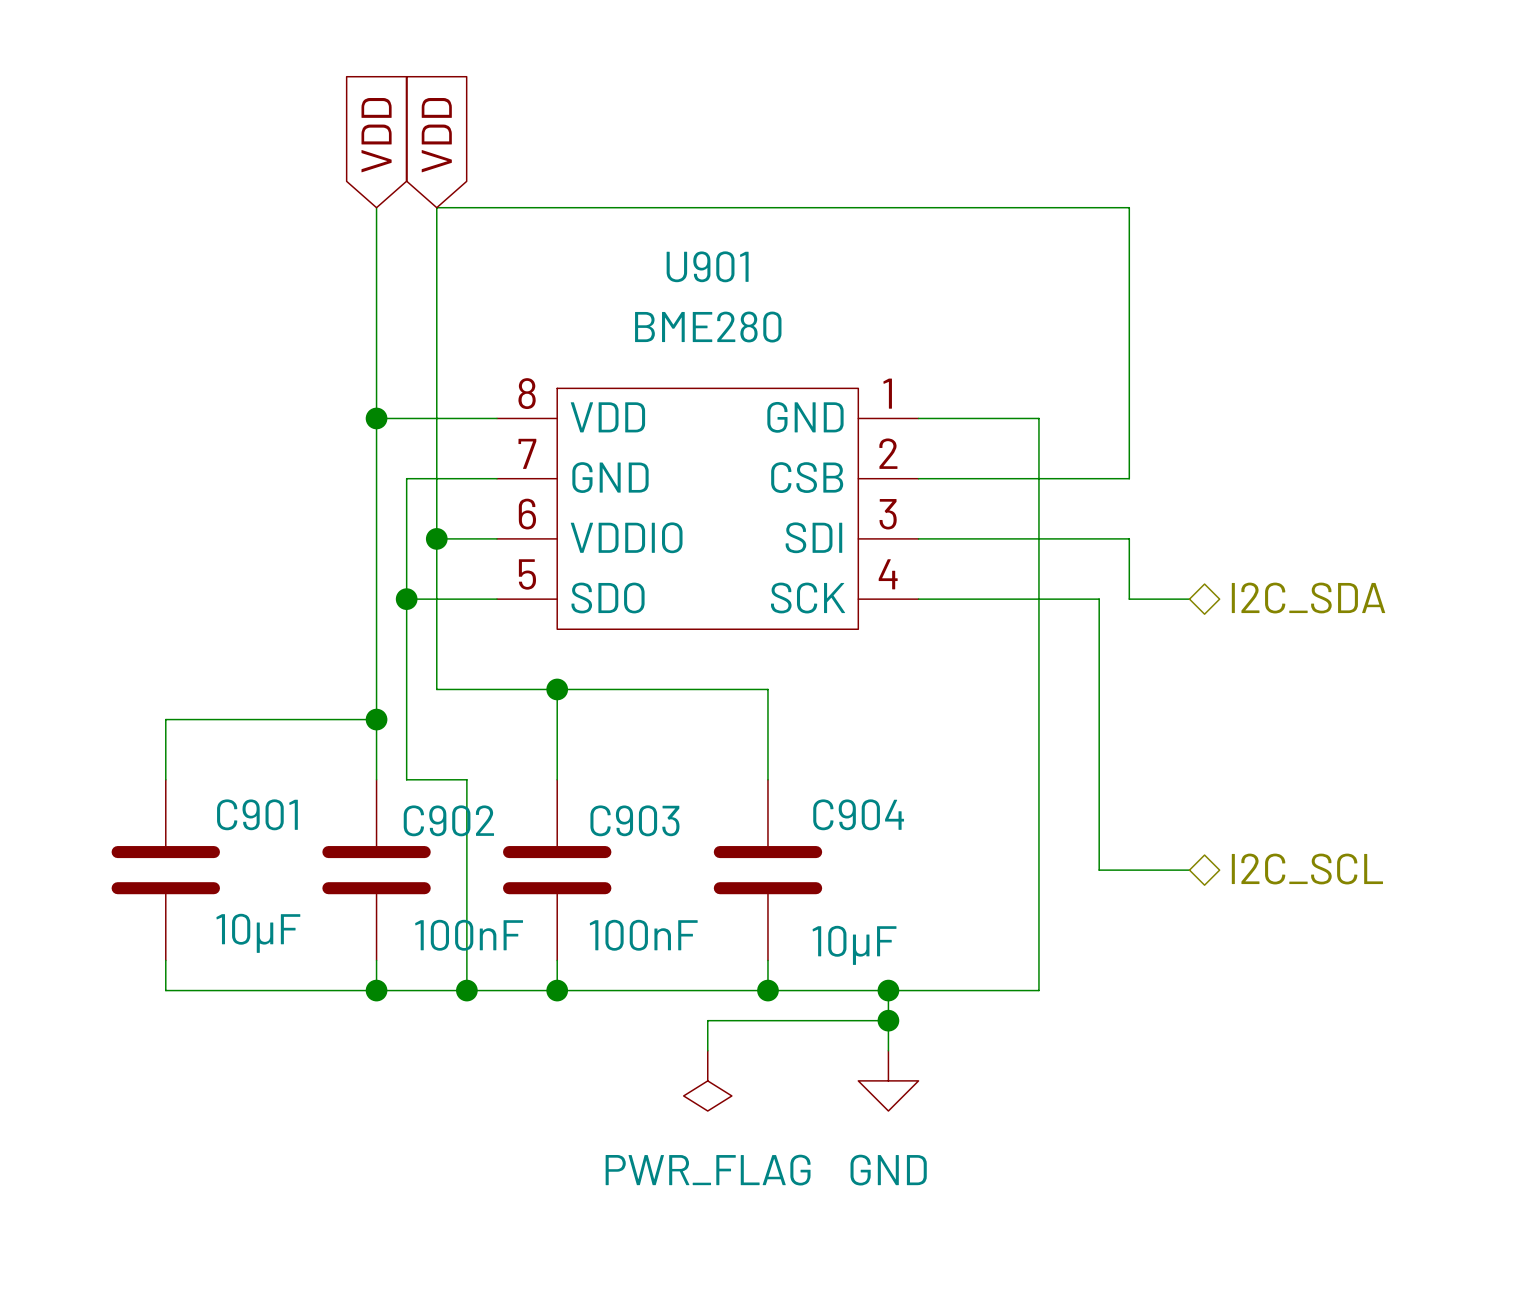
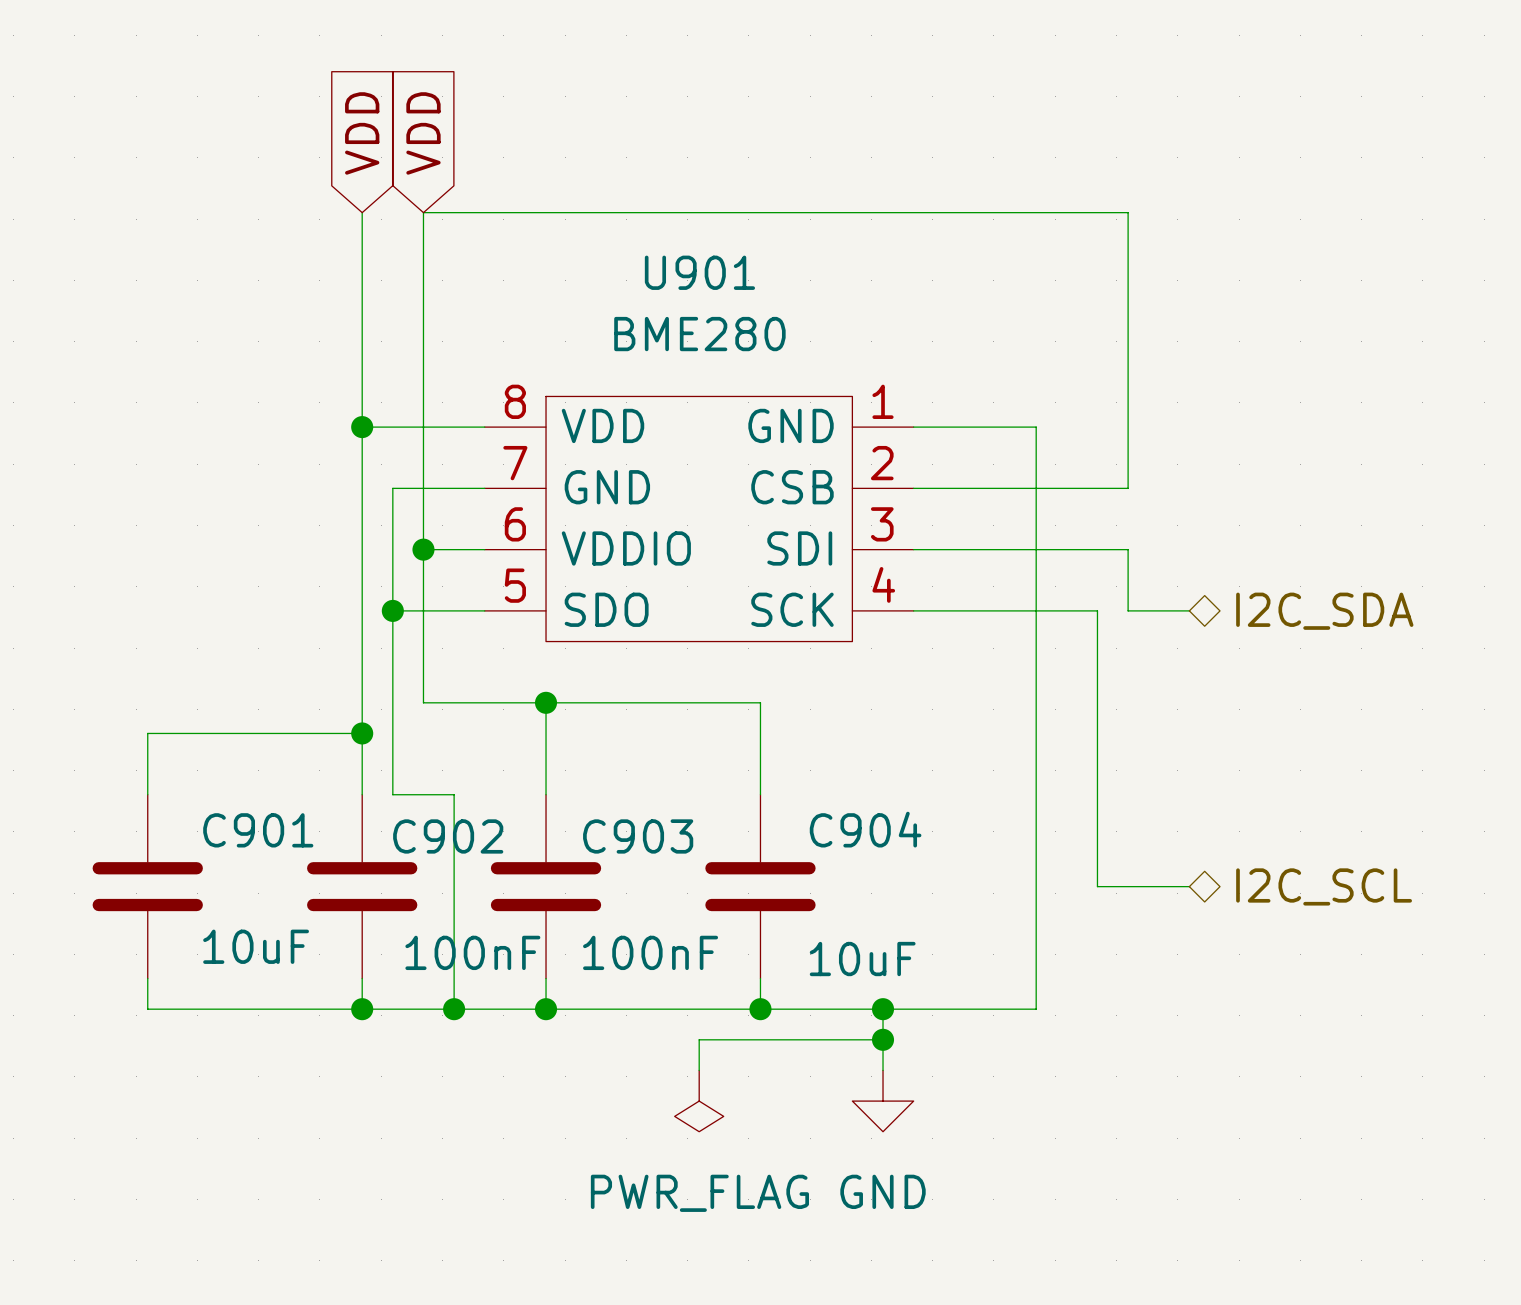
C901 value: 10μF (258, 933) -> 10uF (256, 946)
C904 value: 10μF (854, 945) -> 10uF (862, 959)

